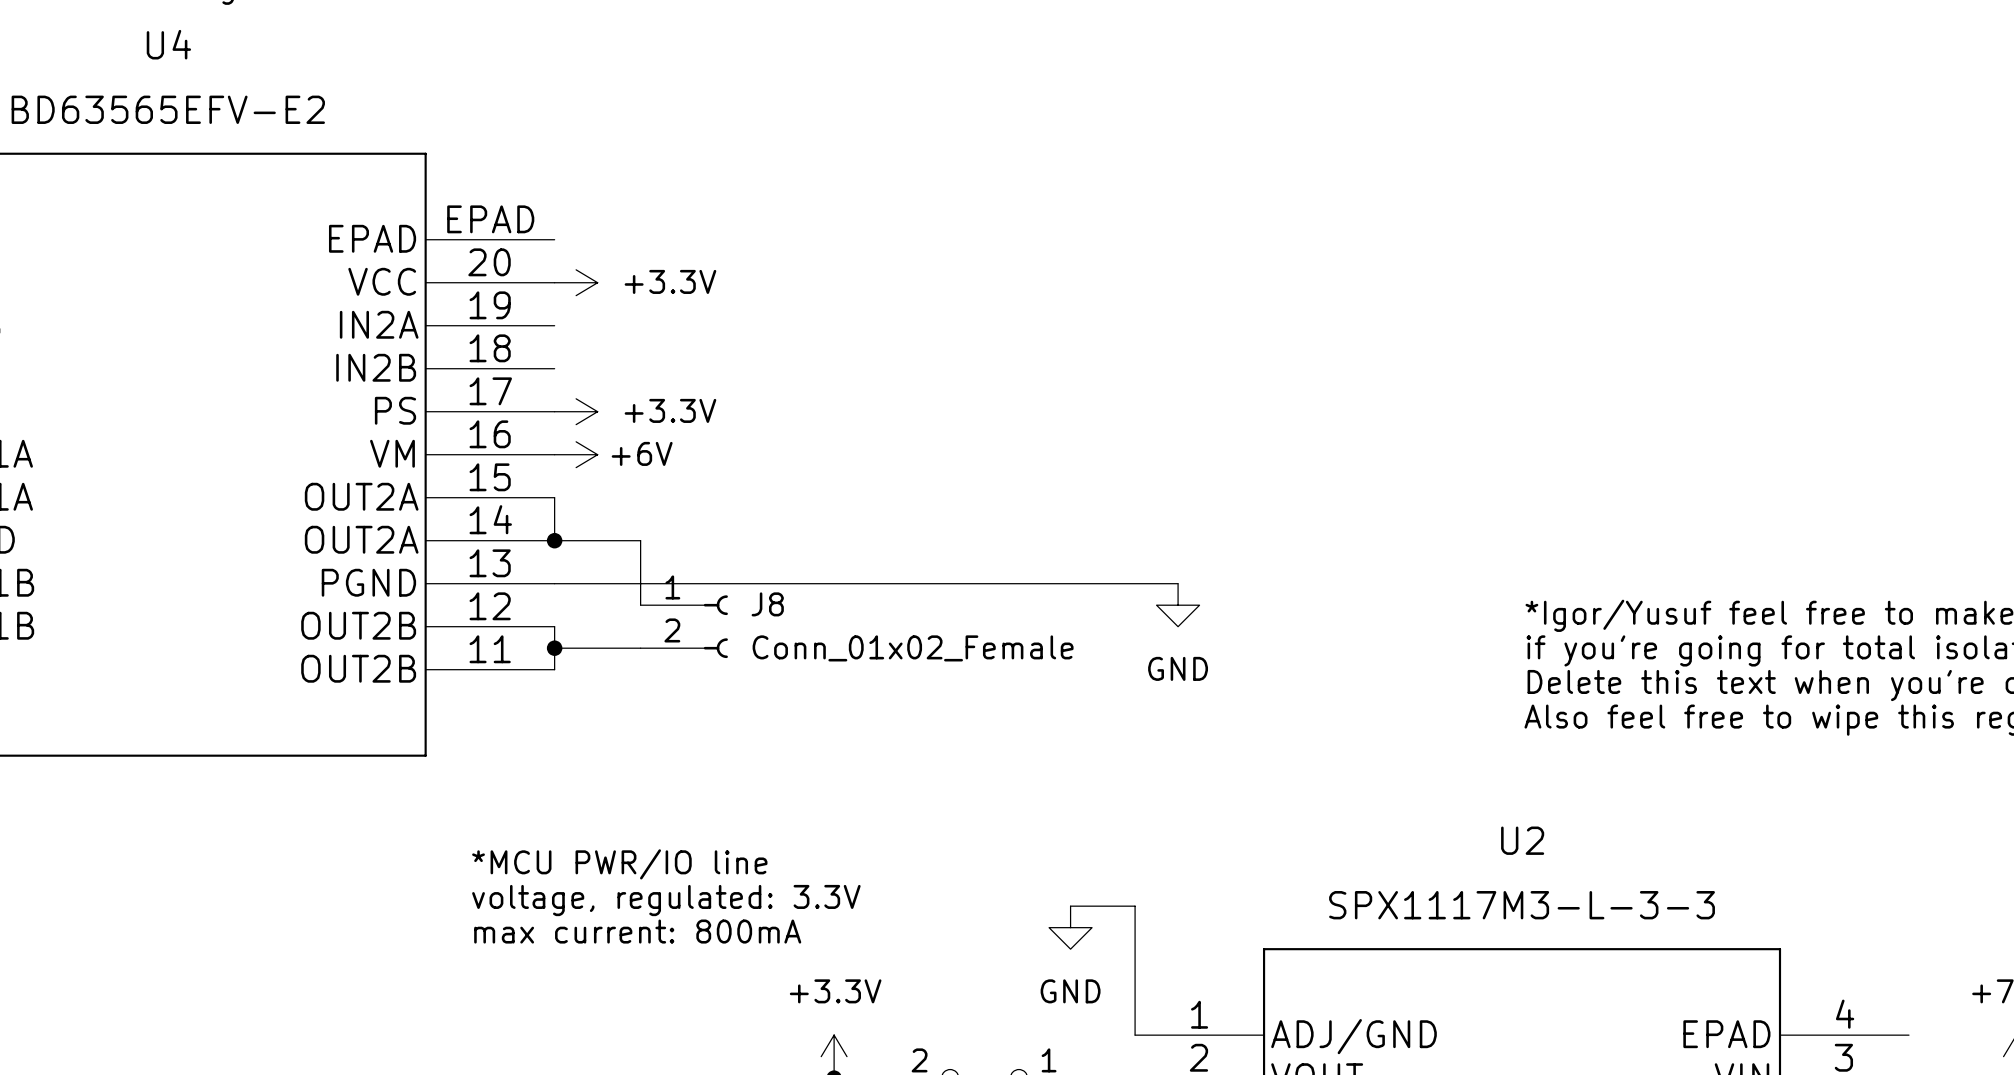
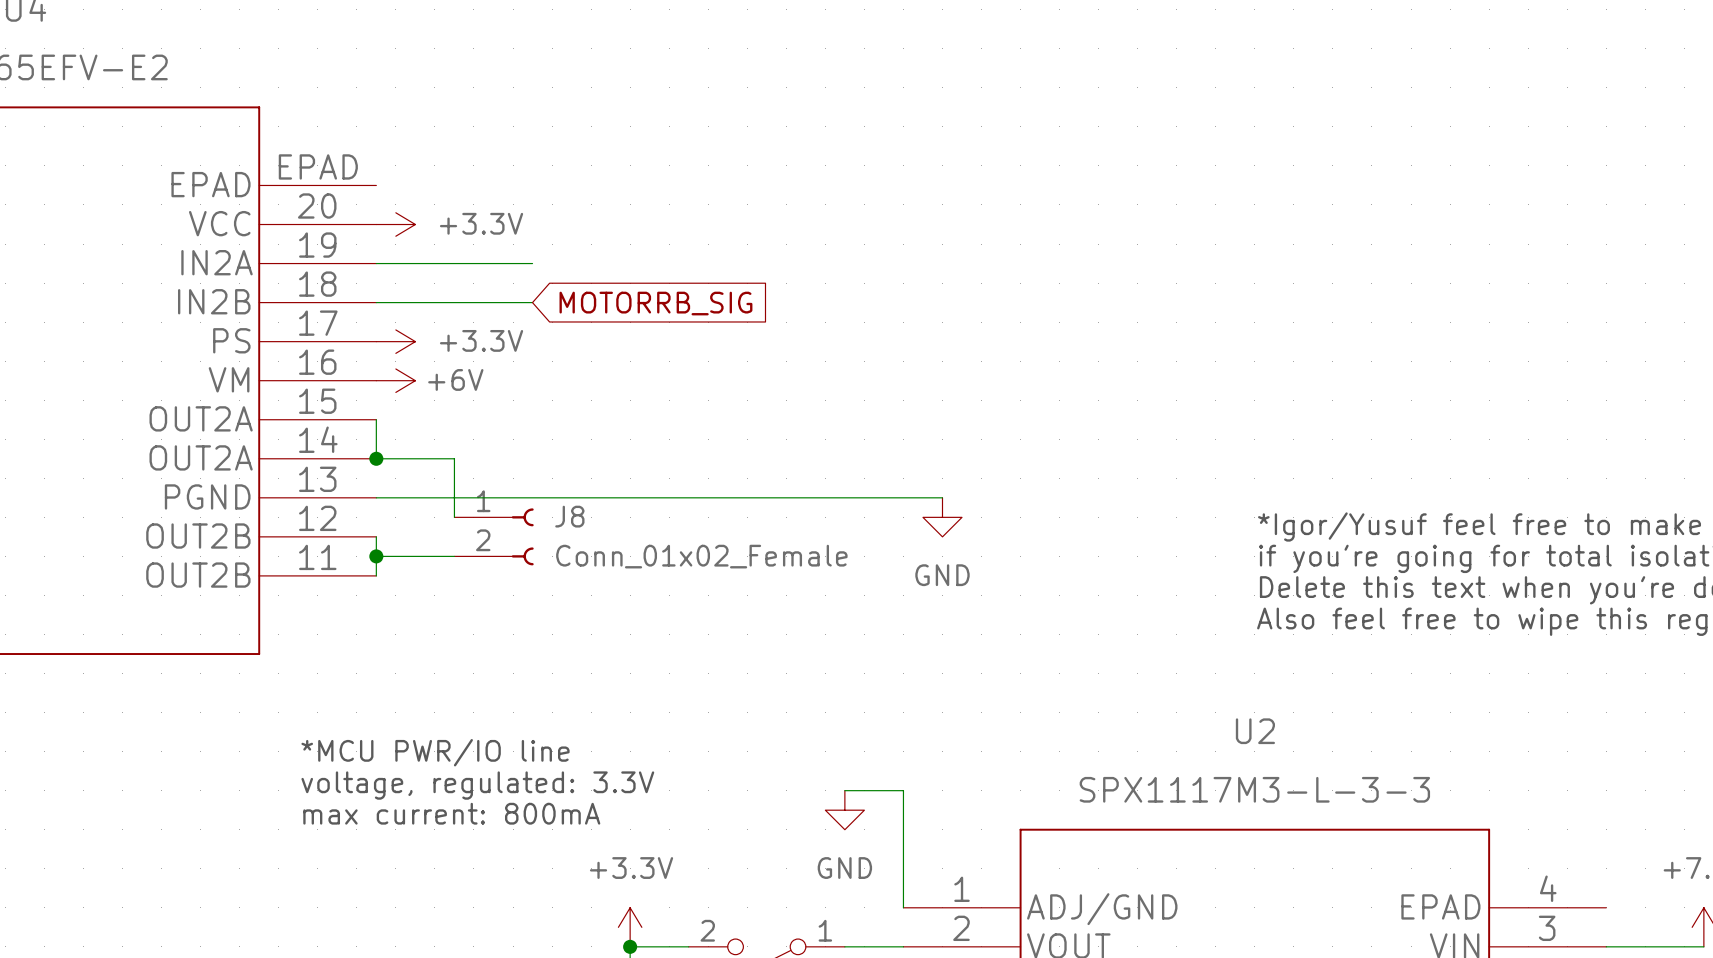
wire: none -> (376, 263) (532, 263)
wire: none -> (376, 302) (532, 302)
global label: none -> MOTORRB_SIG (655, 303)

